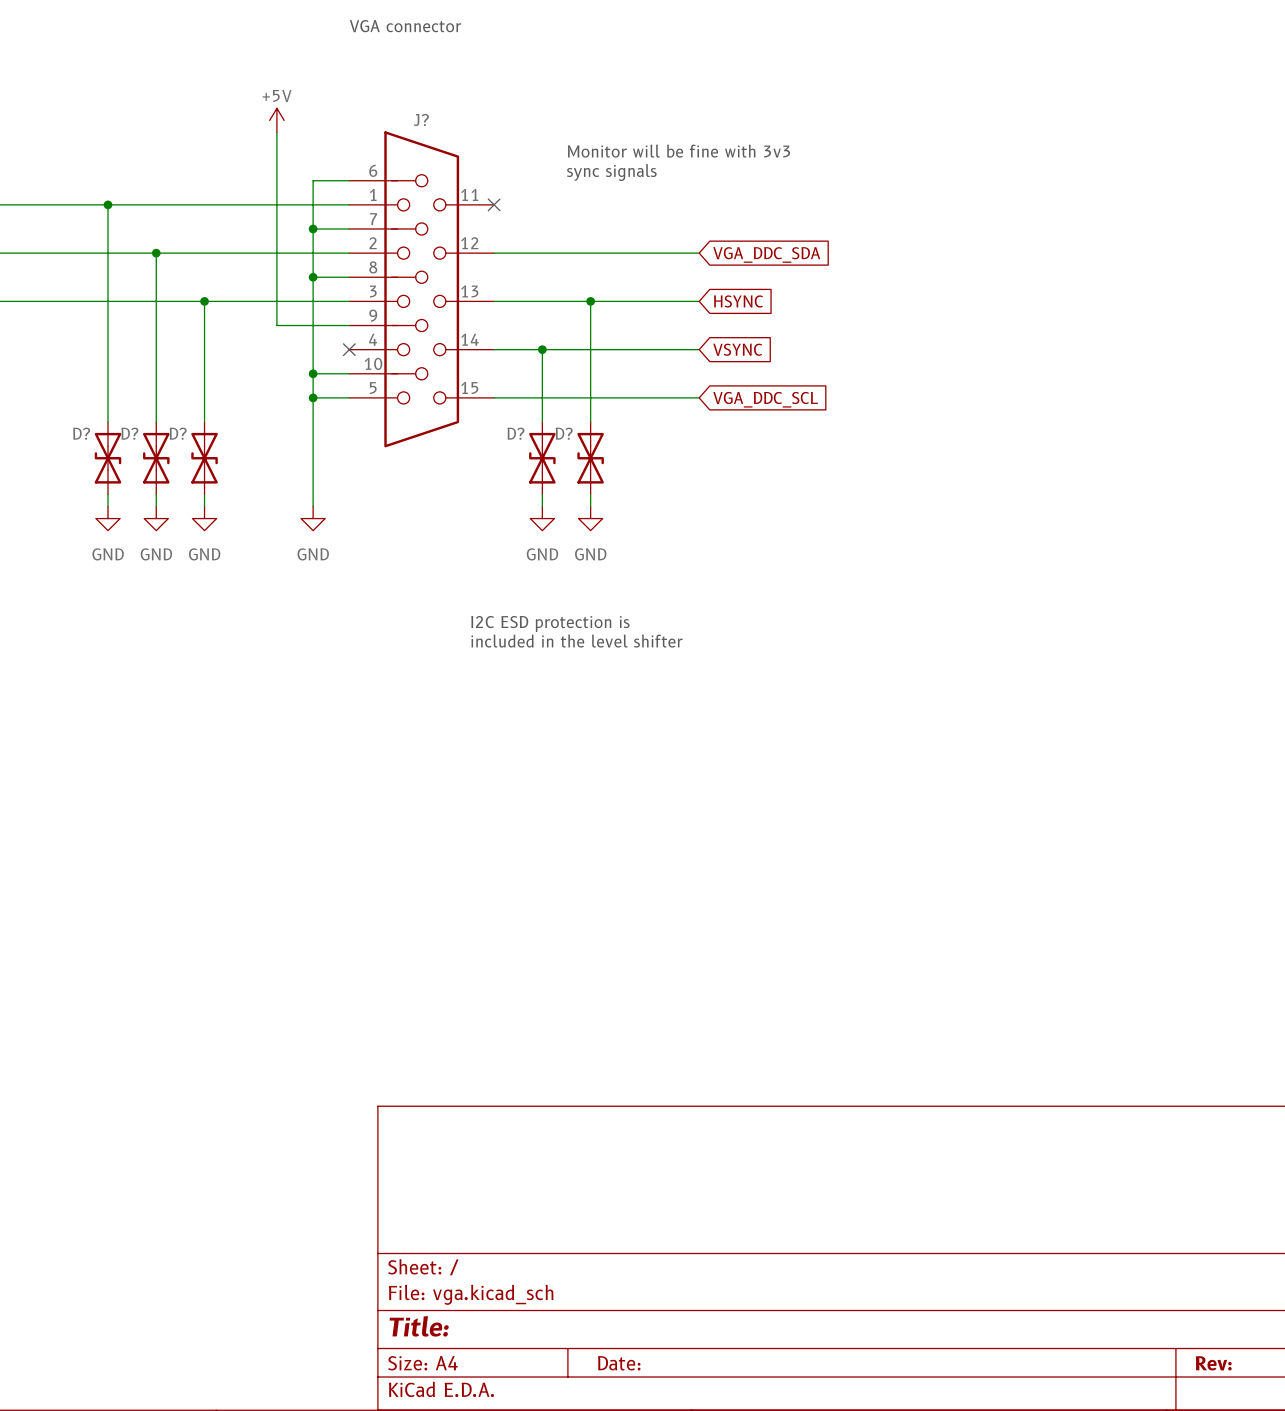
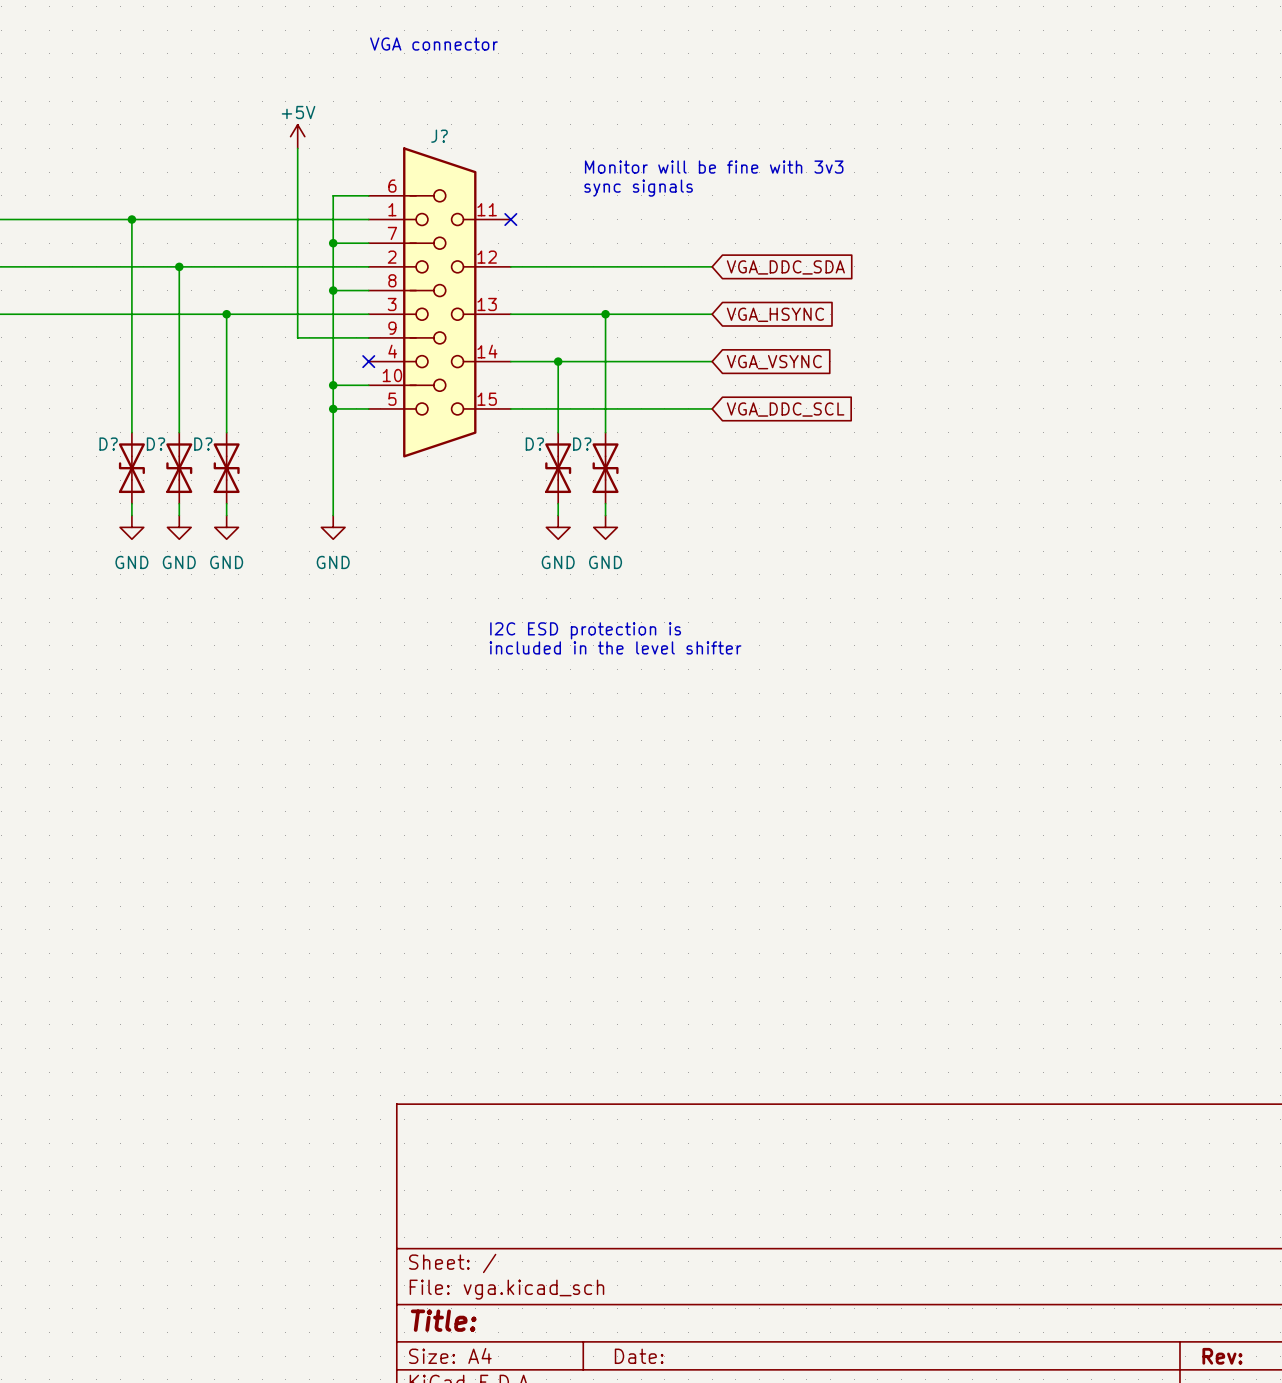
global label: HSYNC (738, 301) -> VGA_HSYNC (775, 314)
global label: VSYNC (737, 349) -> VGA_VSYNC (774, 362)

